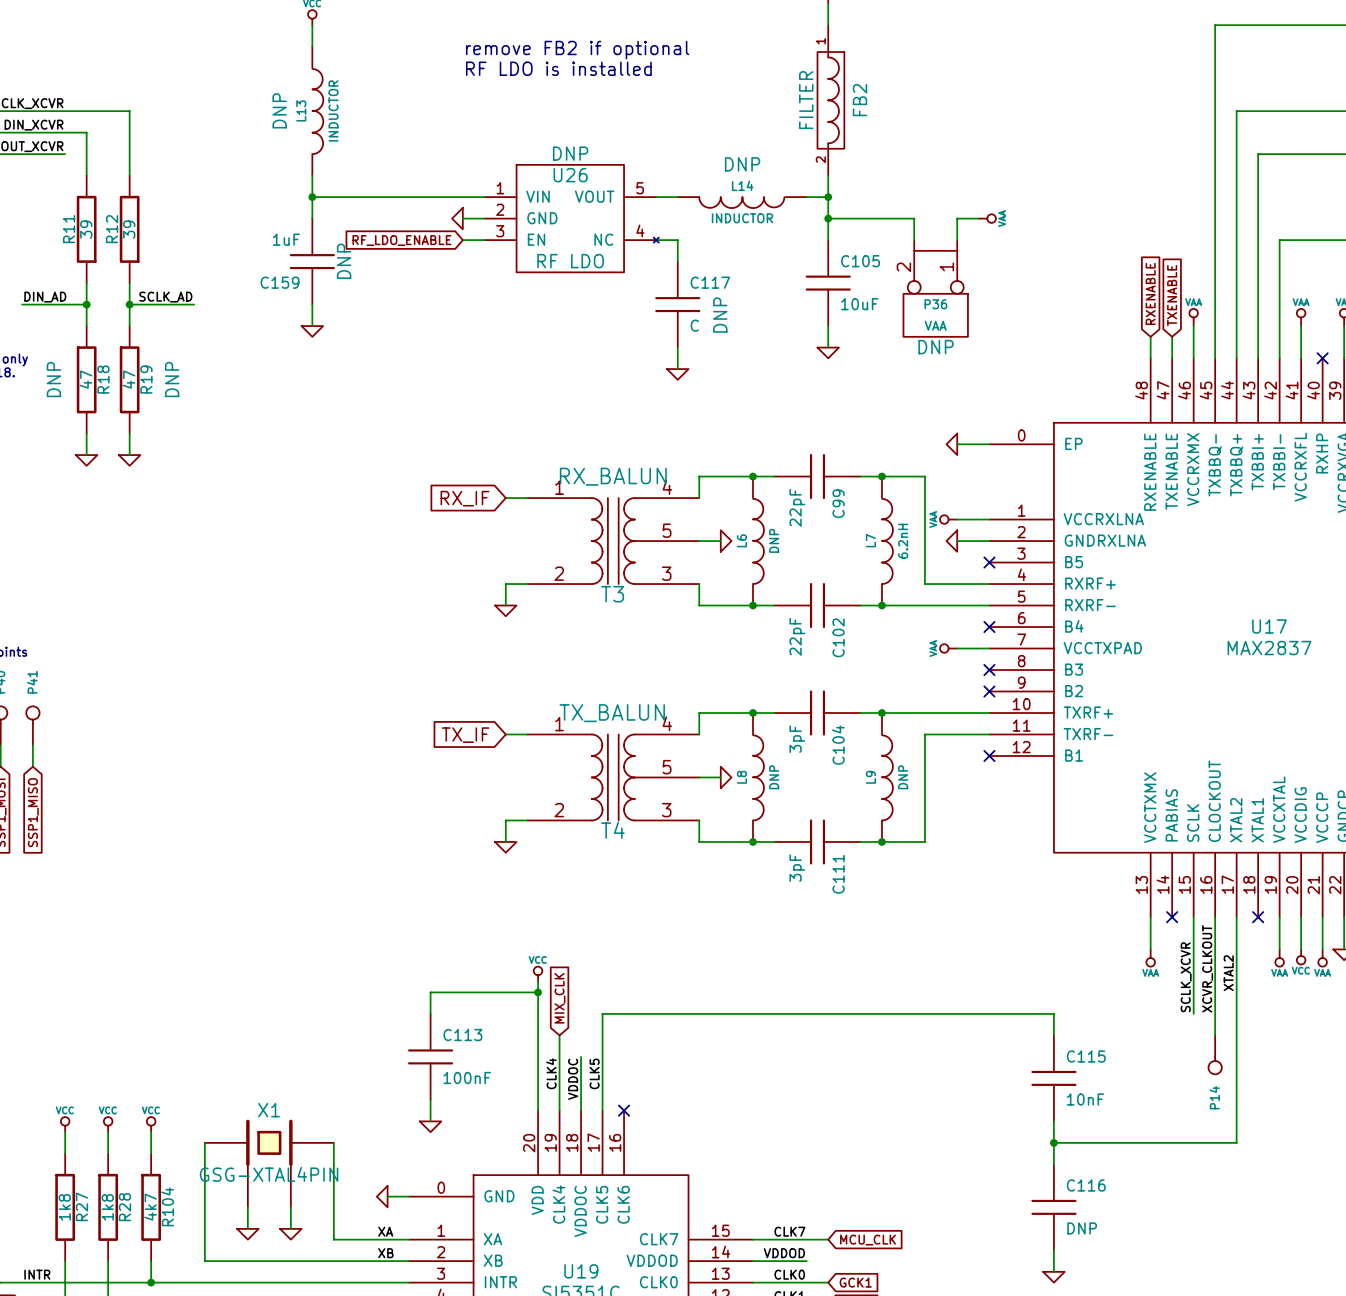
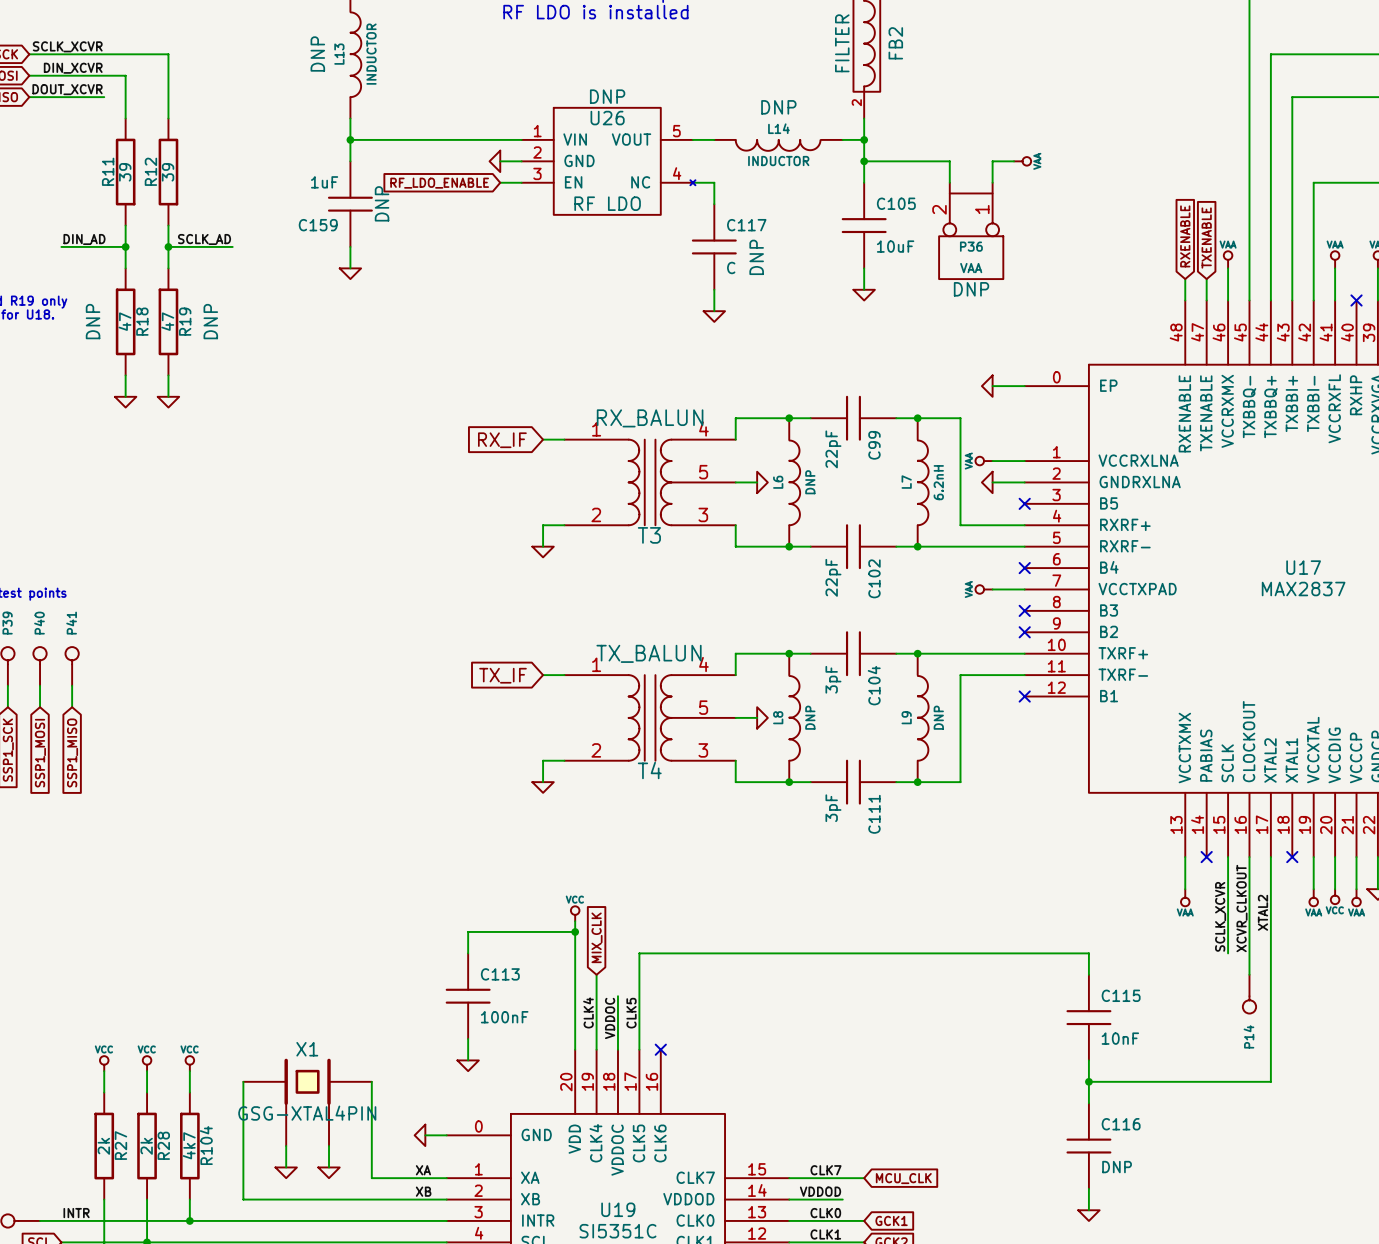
R27 value: 1k8 (64, 1207) -> 2k (103, 1146)
R28 value: 1k8 (107, 1207) -> 2k (146, 1146)

